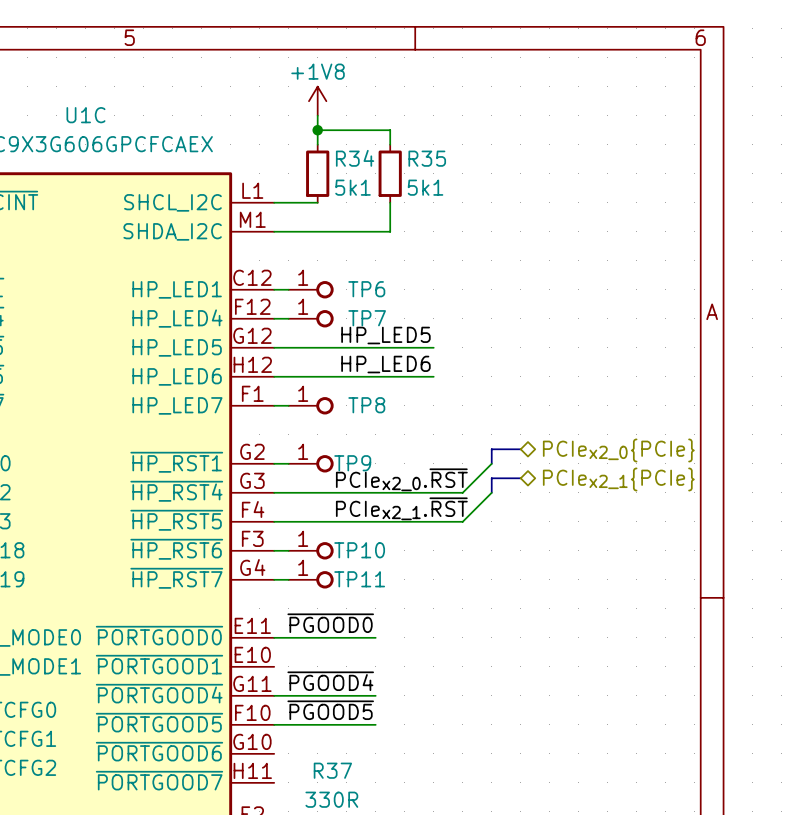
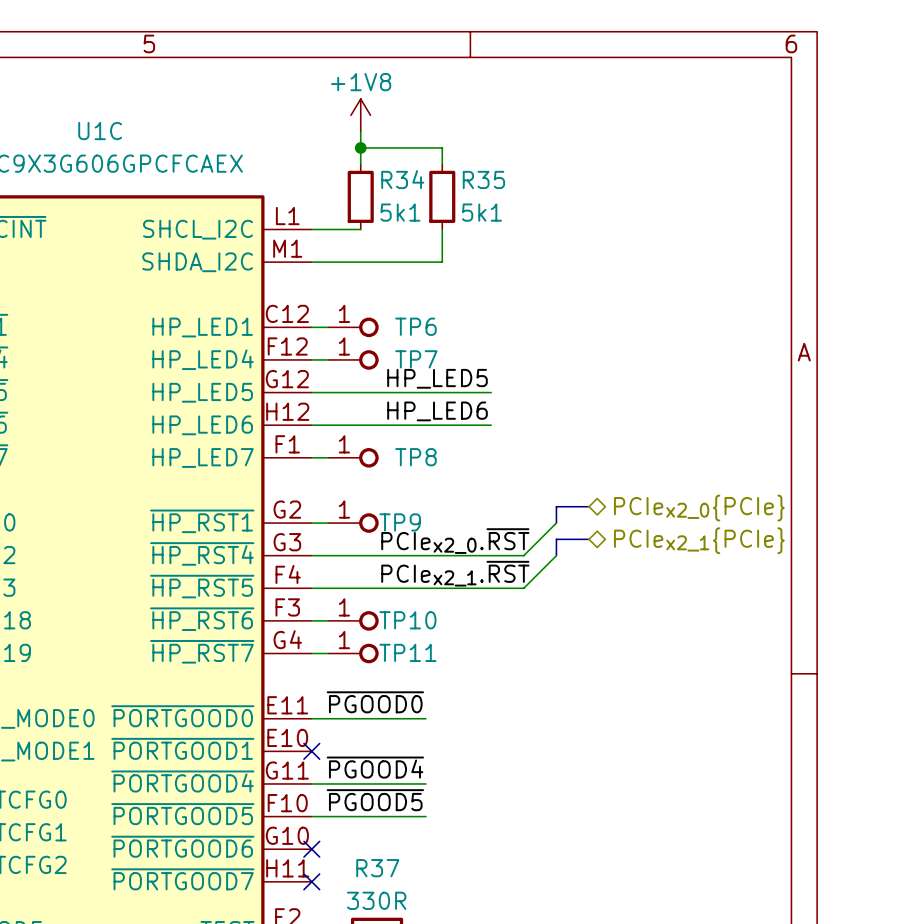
no-connect mark: none -> (311, 751)
no-connect mark: none -> (311, 849)
no-connect mark: none -> (311, 881)

